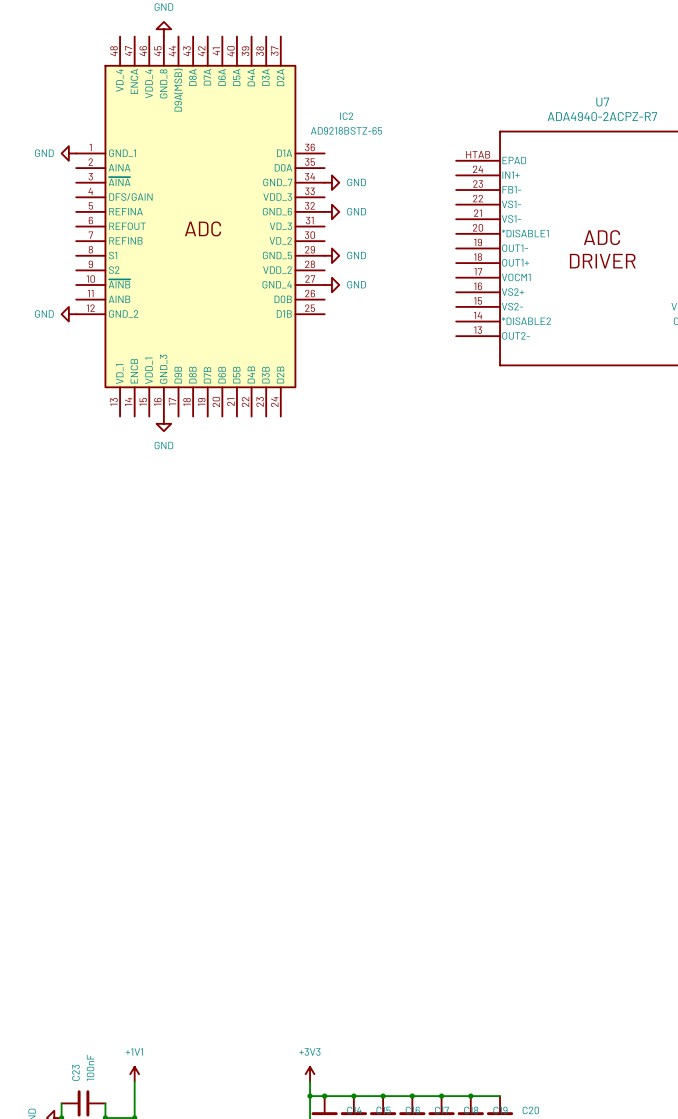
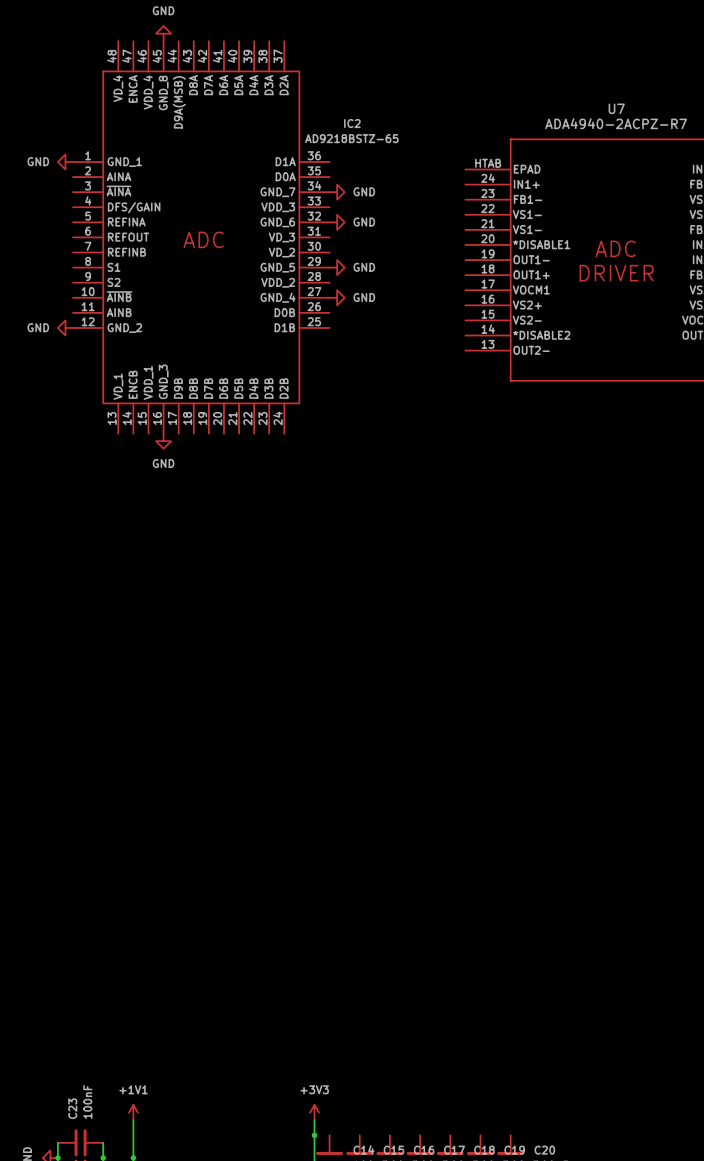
wire: (310, 1096) (500, 1096) -> none
junction: (324, 1096) -> none
junction: (353, 1096) -> none
junction: (383, 1096) -> none
junction: (412, 1096) -> none
junction: (441, 1096) -> none
junction: (470, 1096) -> none
wire: (105, 1118) (134, 1118) -> none

